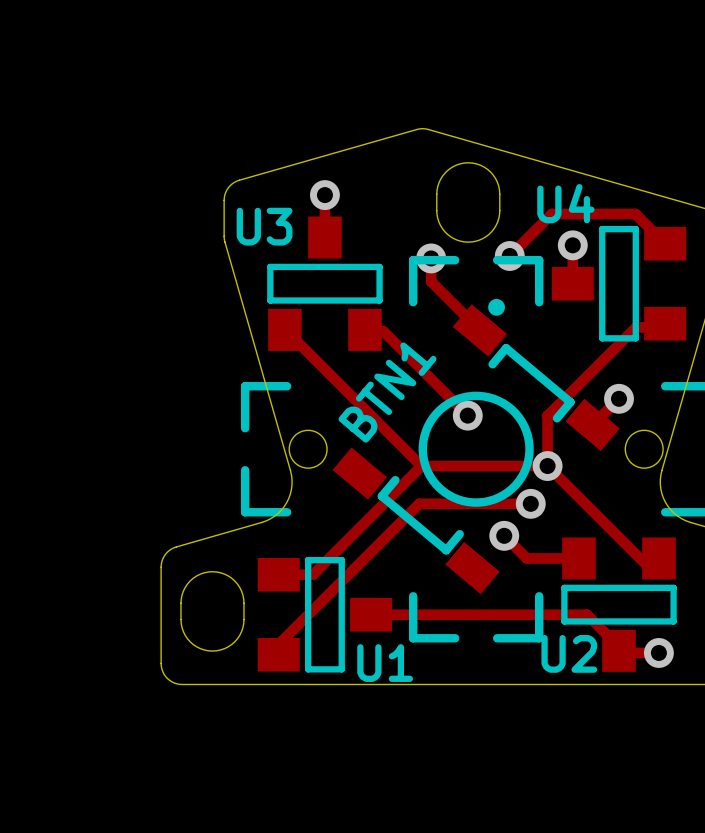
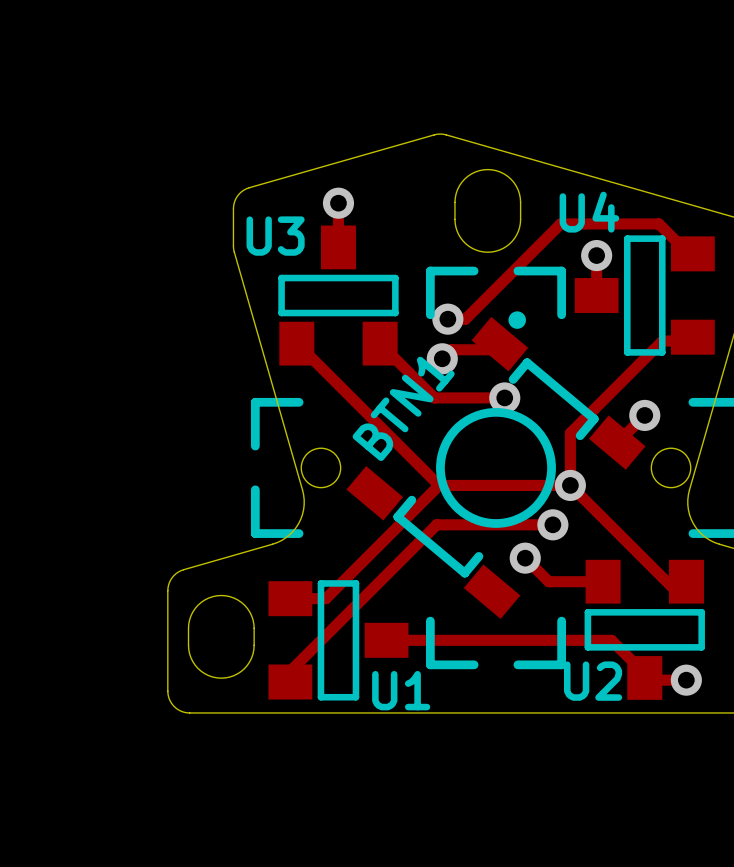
track: none -> (675, 240) (658, 223) (560, 223) (465, 319) (447, 319)
track: (665, 243) (635, 213) (551, 213) (509, 255) -> none
via: (509, 255) -> none
track: (431, 258) (431, 281) (479, 330) -> none
via: (431, 258) -> none
via: none -> (447, 319)
track: none -> (380, 343) (434, 397) (504, 397)
track: (371, 331) (383, 331) (467, 415) -> none
track: none -> (491, 349) (451, 349) (442, 358)
via: none -> (442, 358)
via position: (467, 415) -> (504, 397)

